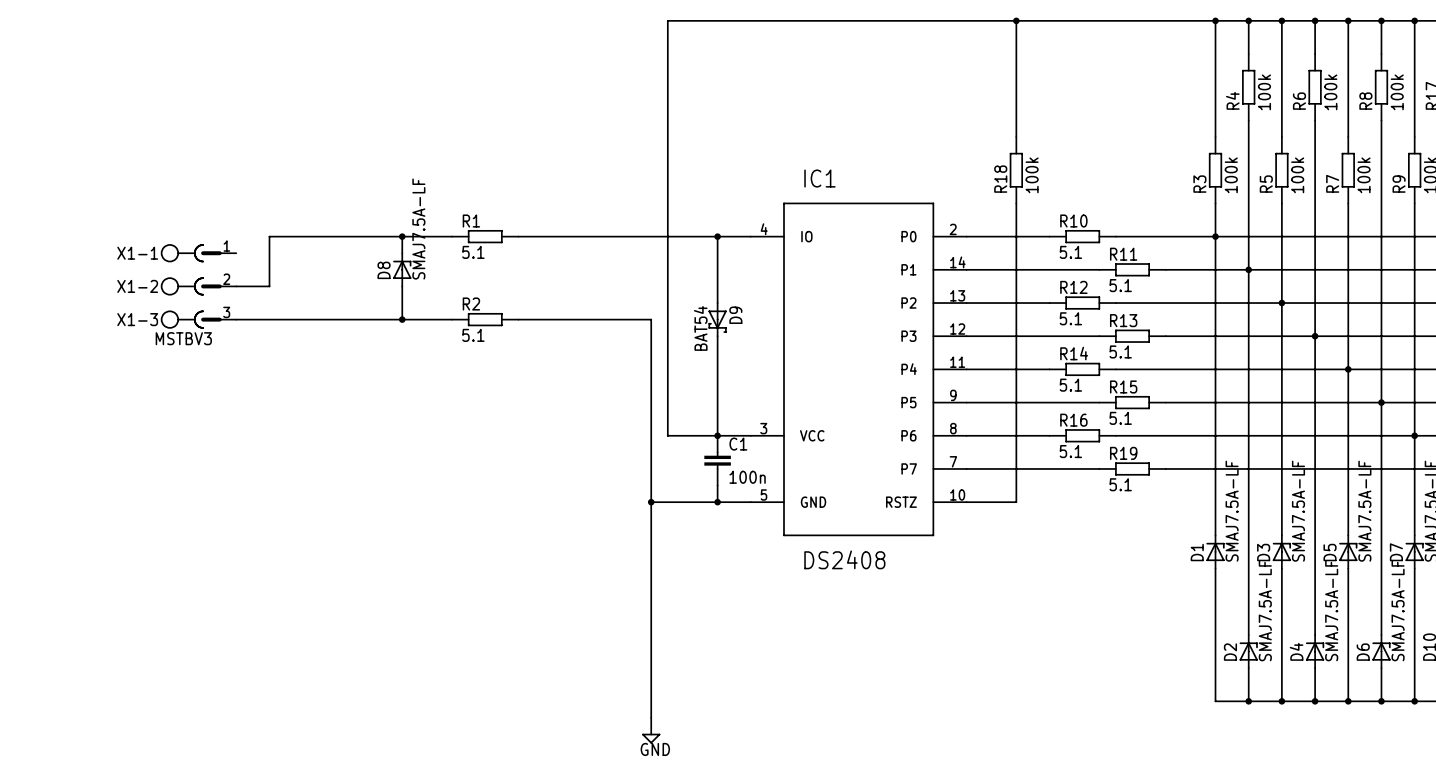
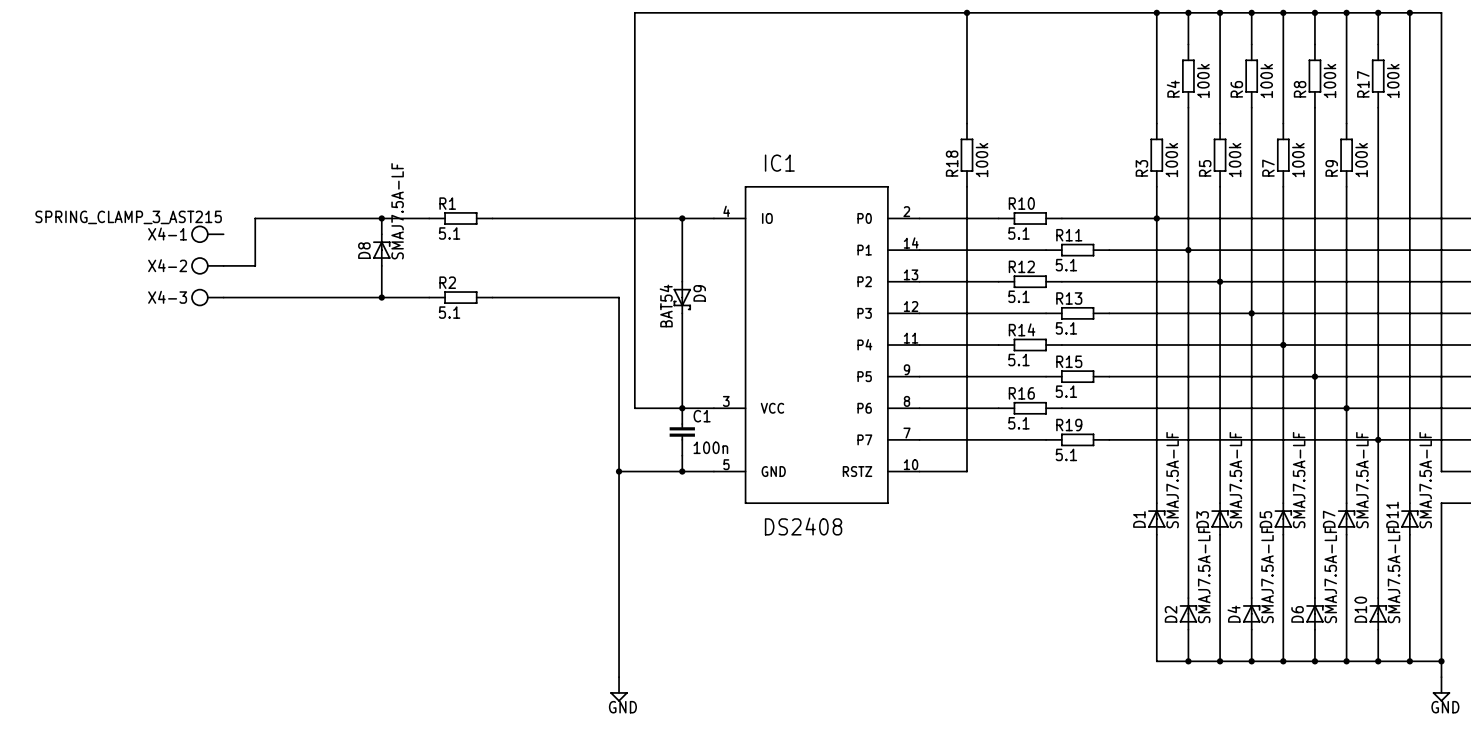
X1-1: (198, 253) -> none
X4-1: none -> SPRING_CLAMP_3_AST215 (207, 234)
X1-2: (198, 286) -> none
X4-2: none -> (207, 265)
X1-3: MSTBV3 (198, 319) -> none
X4-3: none -> (207, 297)

